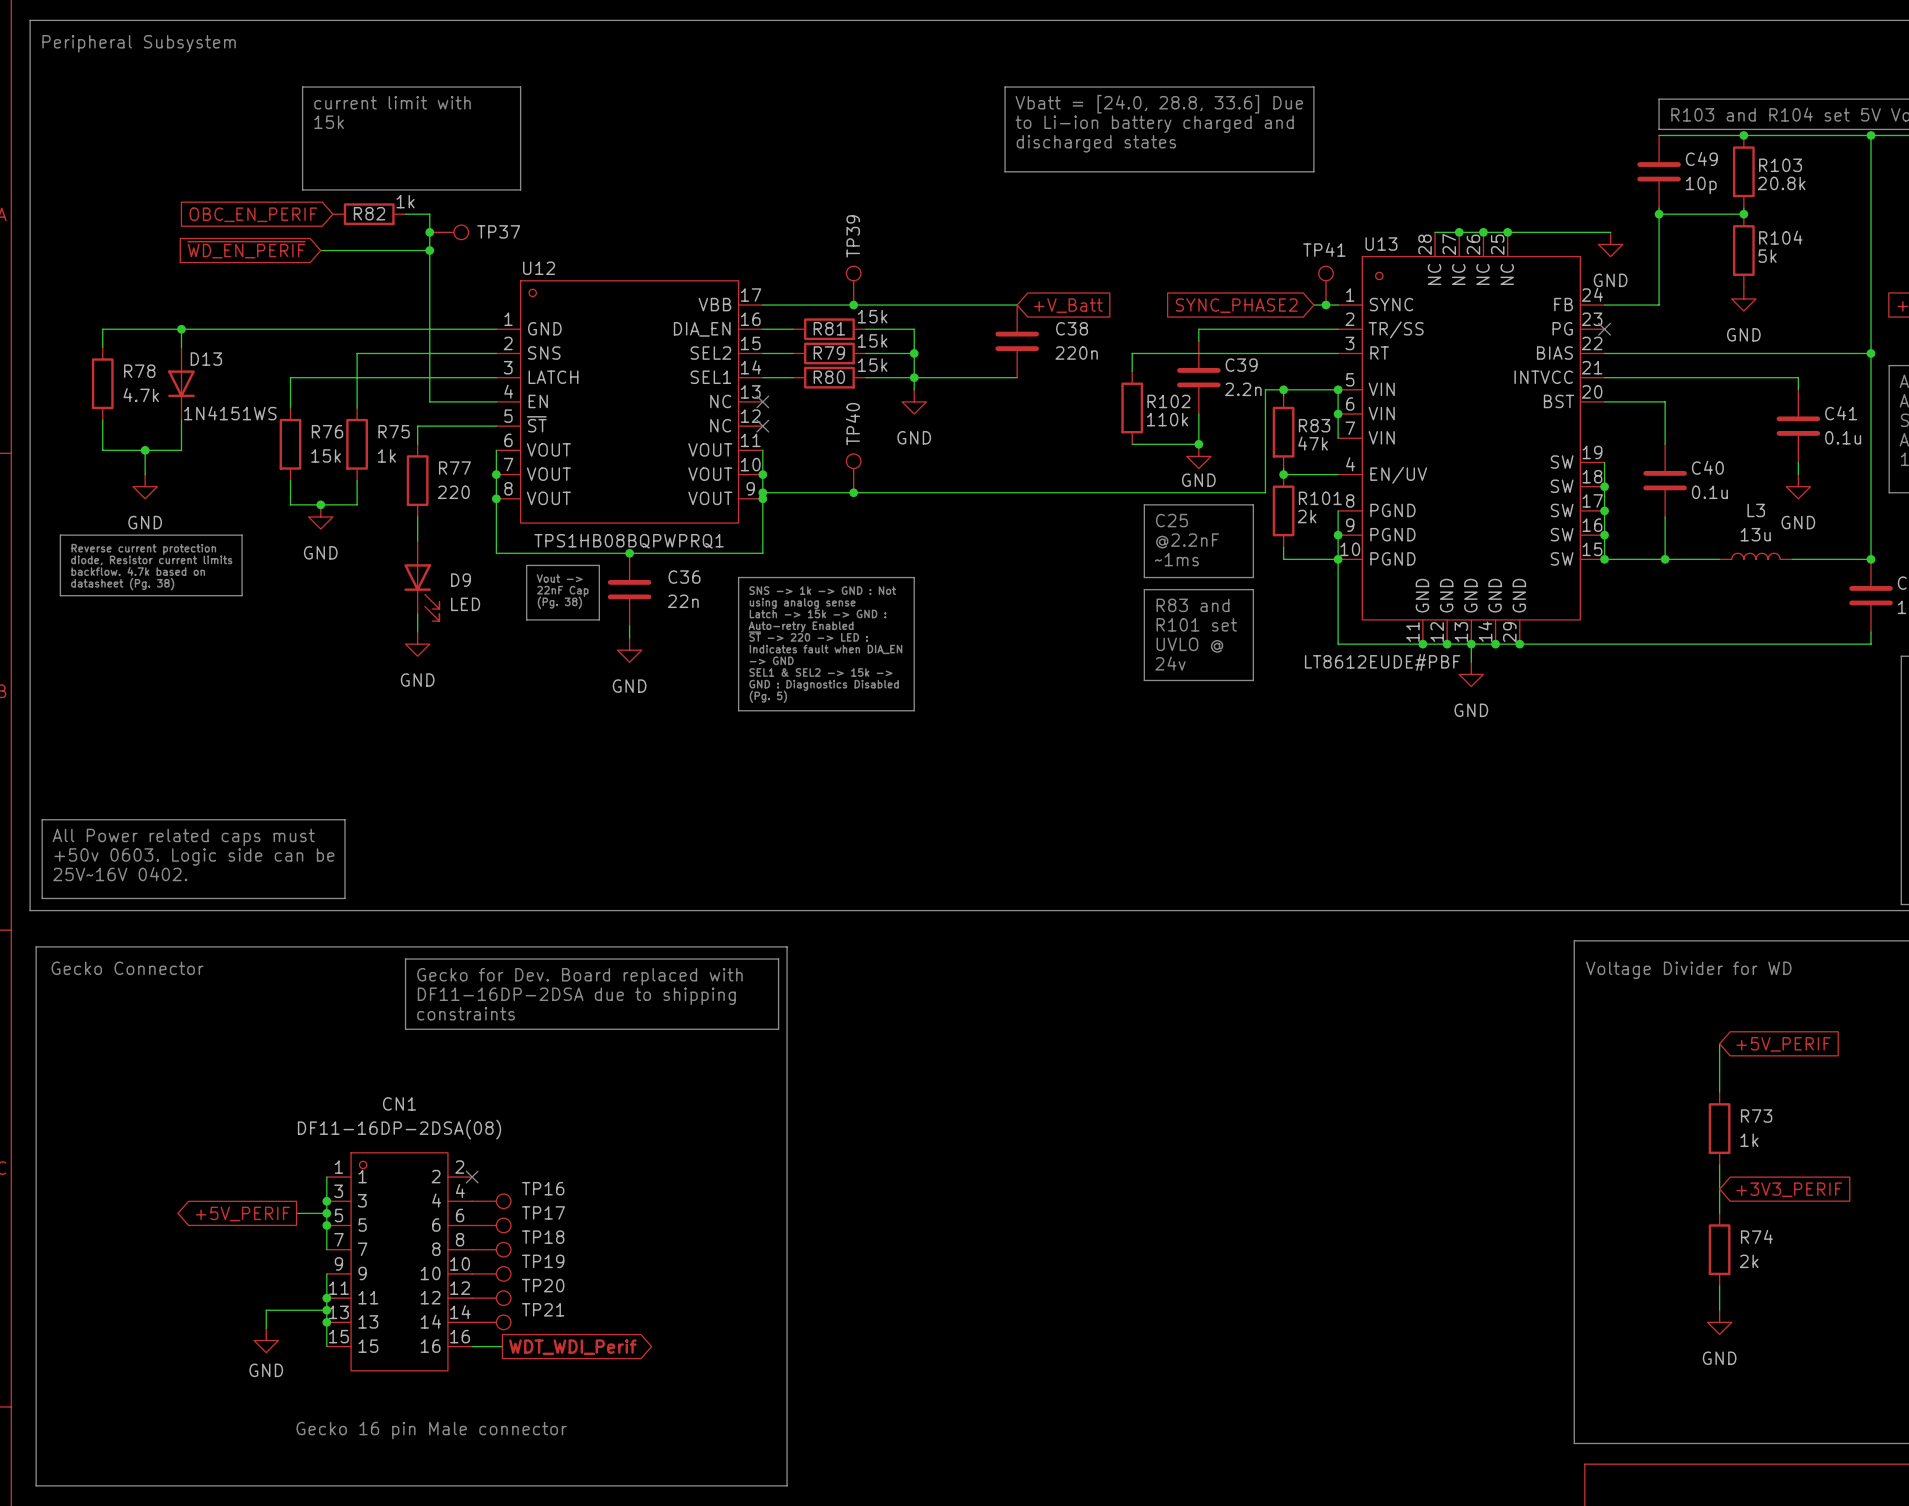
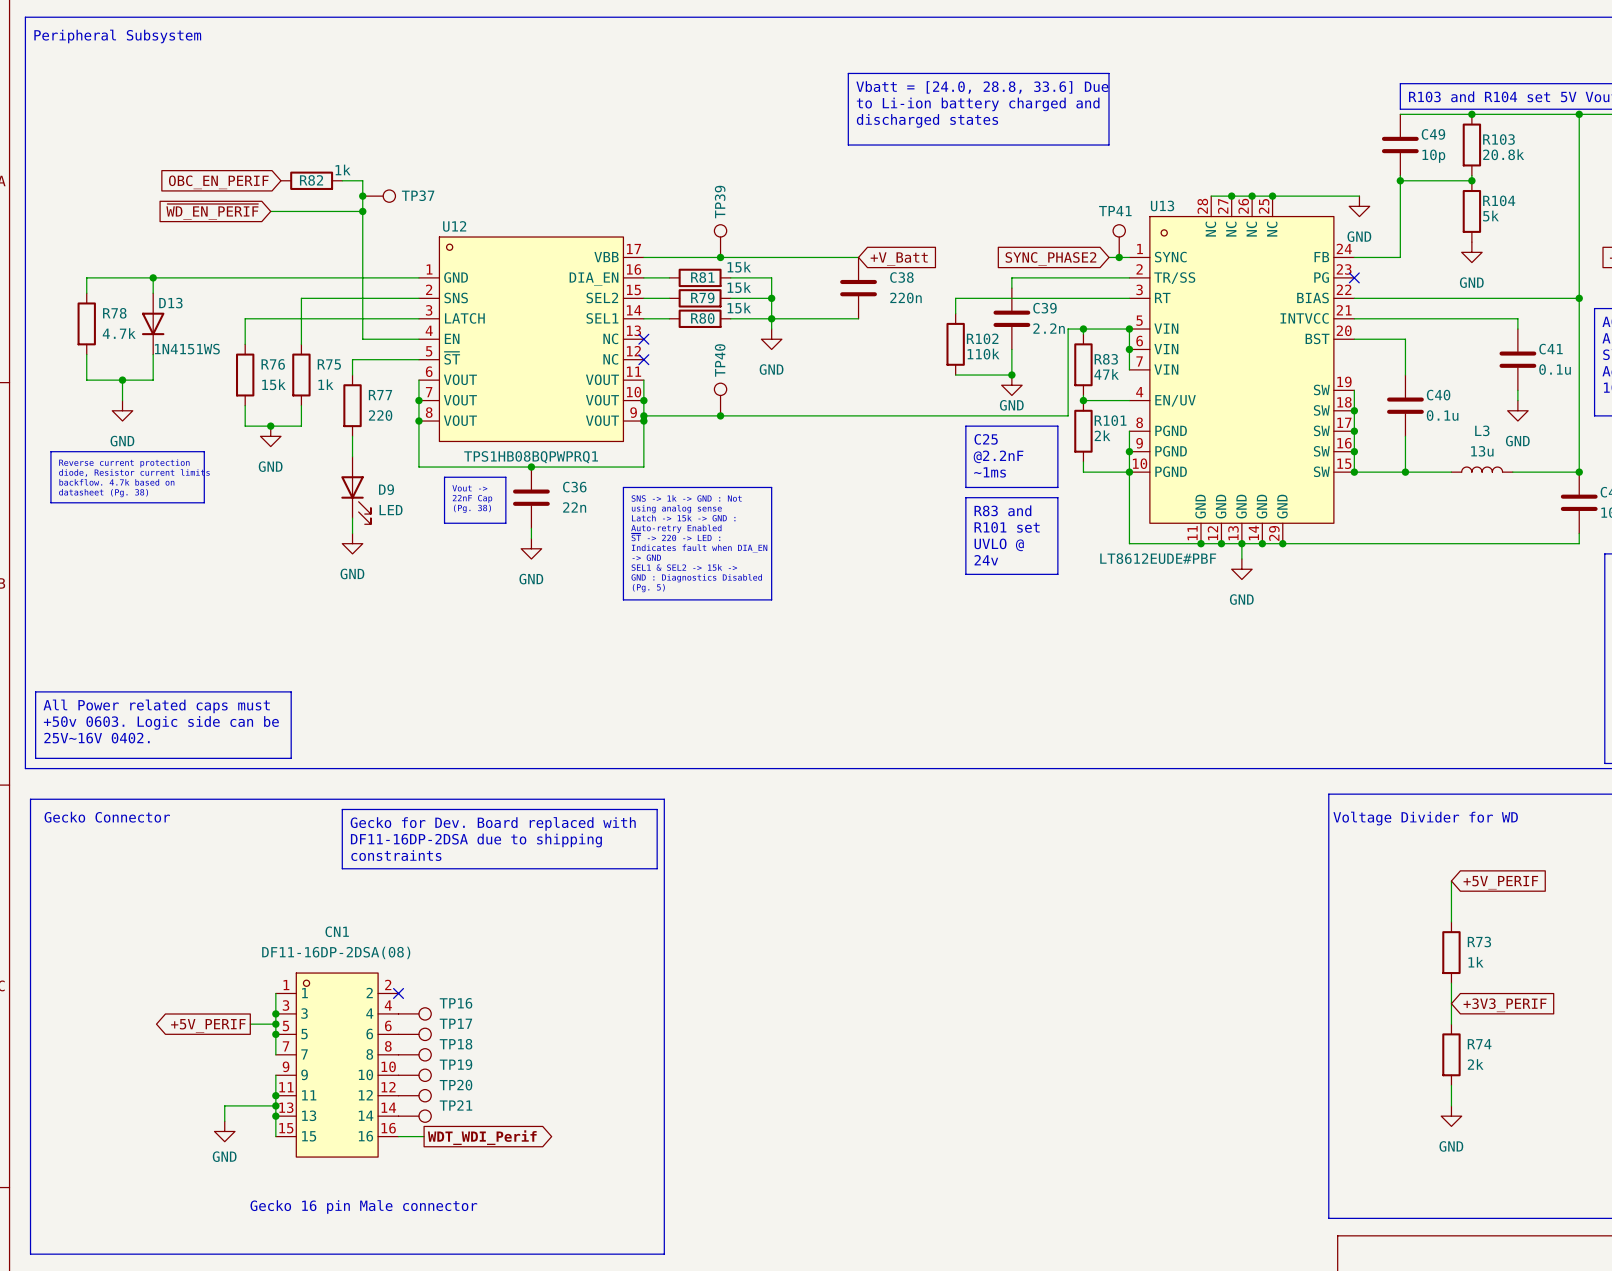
line: (302, 87) (520, 87) (520, 189) (302, 189) (302, 87) -> none
text: current limit with (392, 102) -> none
text: 15k (329, 122) -> none

